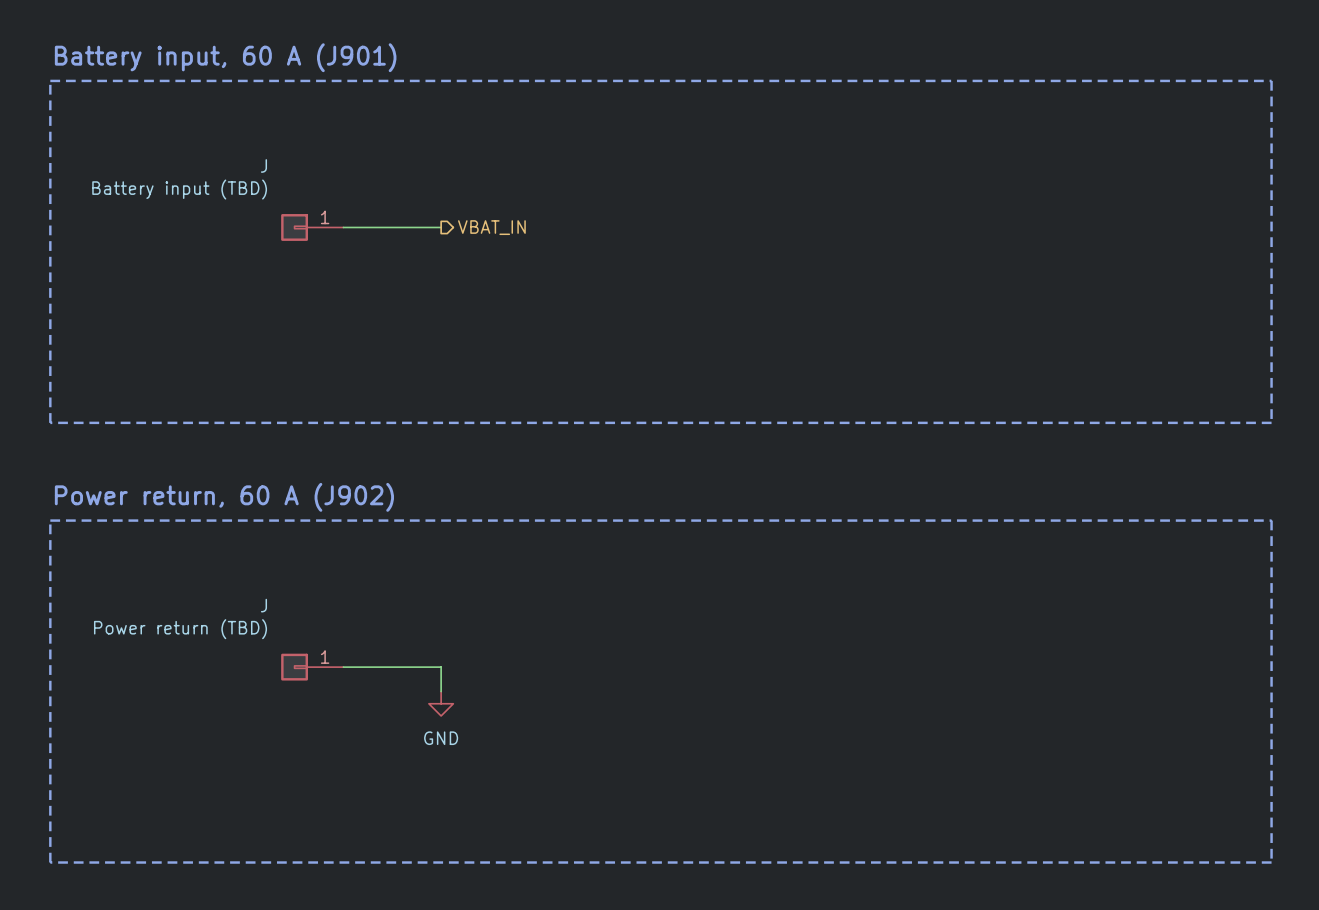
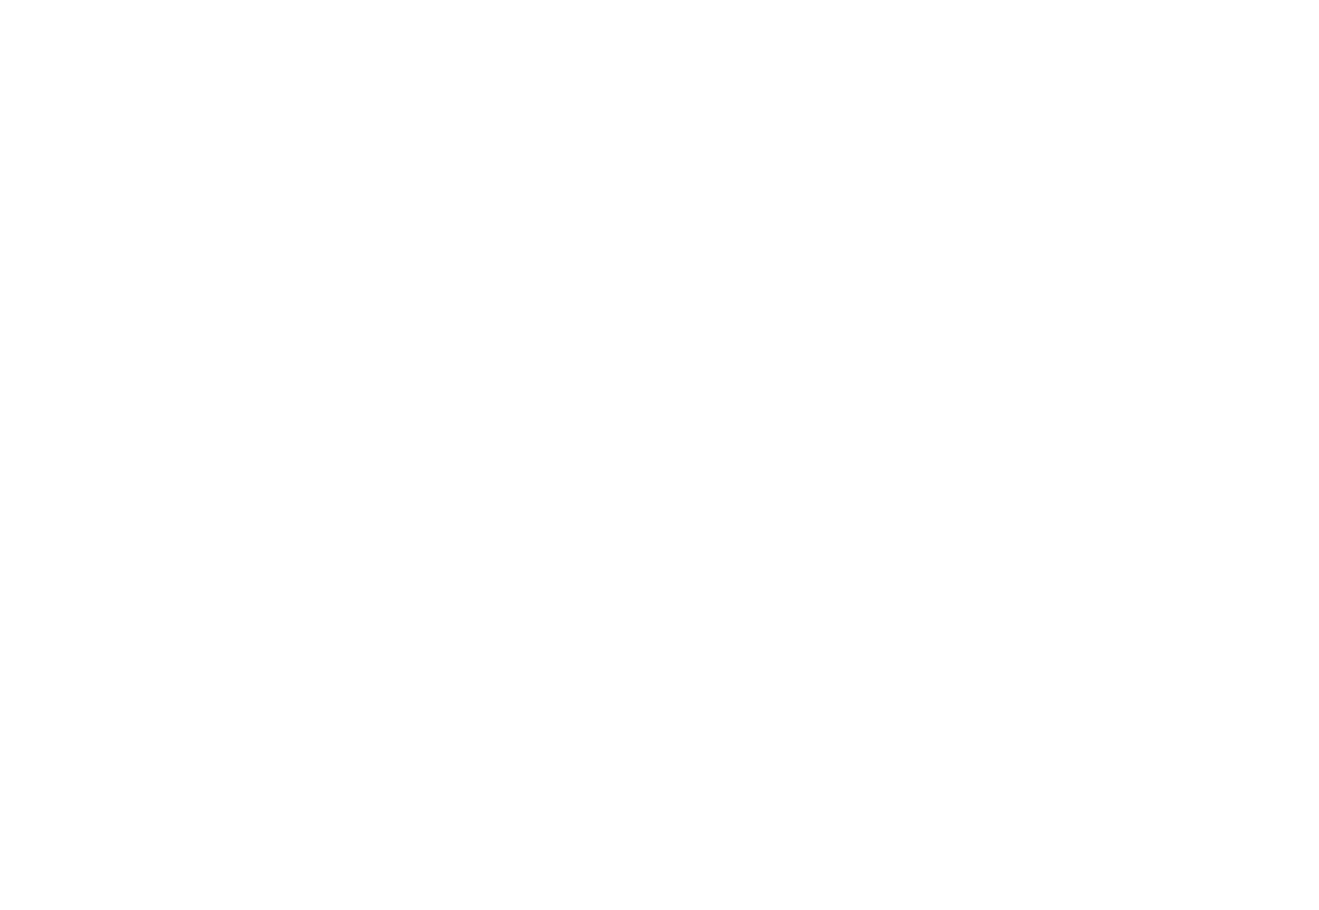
text: Battery input, 60 A (J901) (225, 57) -> none
line: (50, 80) (1271, 80) (1271, 422) (50, 422) (50, 80) -> none
J: Battery input (TBD) (312, 227) -> none
wire: (343, 227) (441, 227) -> none
hierarchical label: VBAT_IN (491, 227) -> none
text: Power return, 60 A (J902) (224, 497) -> none
line: (50, 520) (50, 862) (1271, 862) (1271, 520) (50, 520) -> none
J: Power return (TBD) (312, 667) -> none
wire: (343, 667) (441, 667) (441, 691) -> none
power symbol: GND (441, 703) -> none

